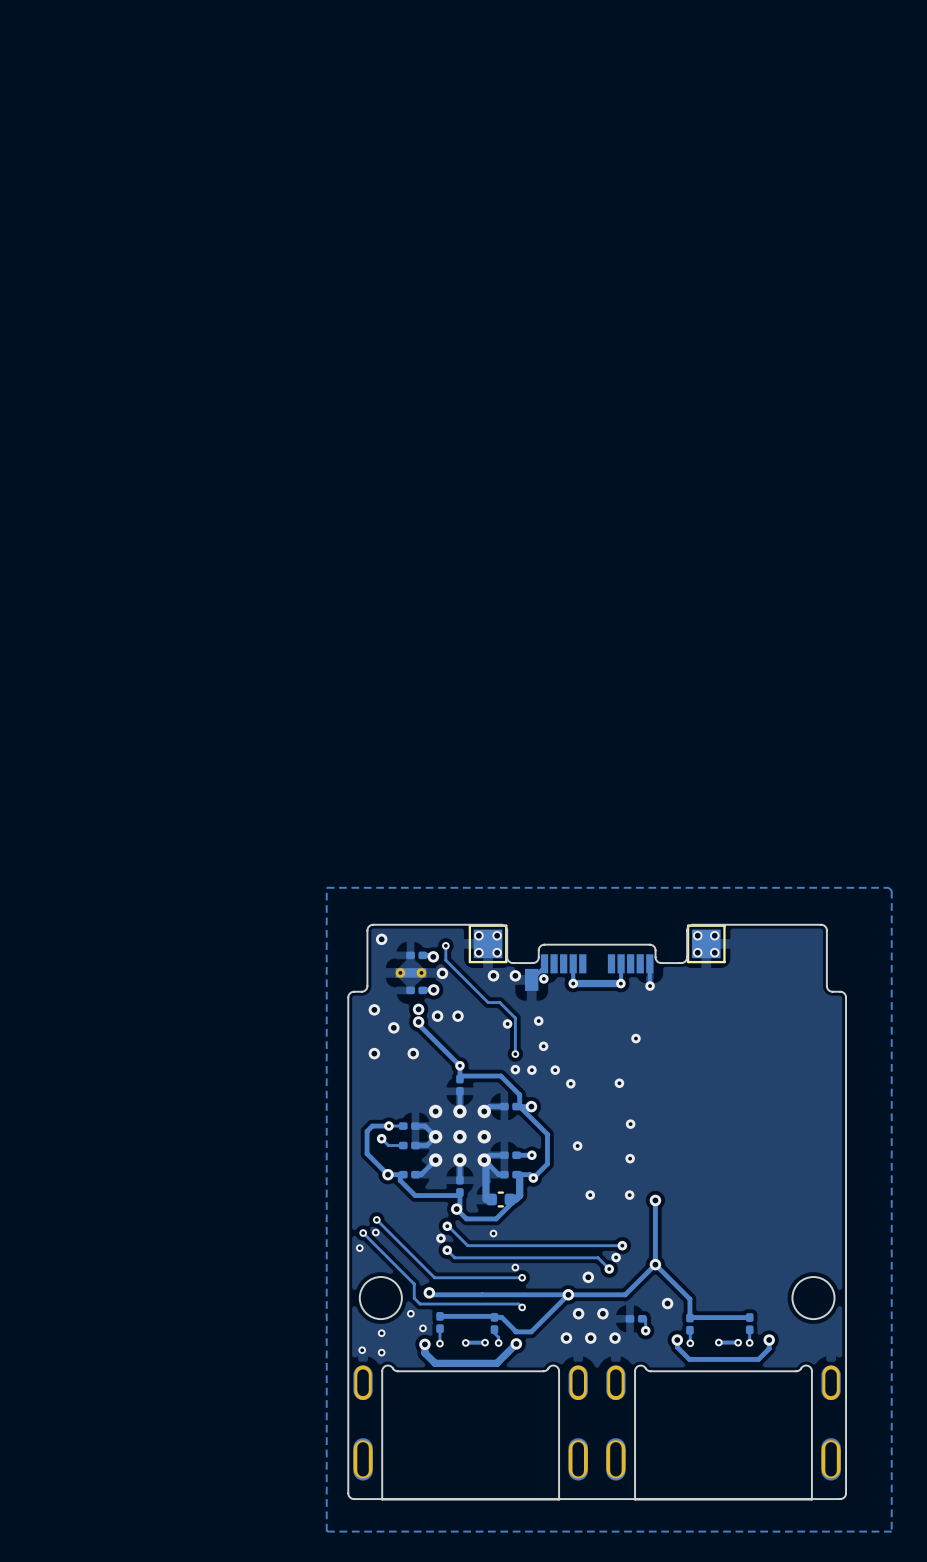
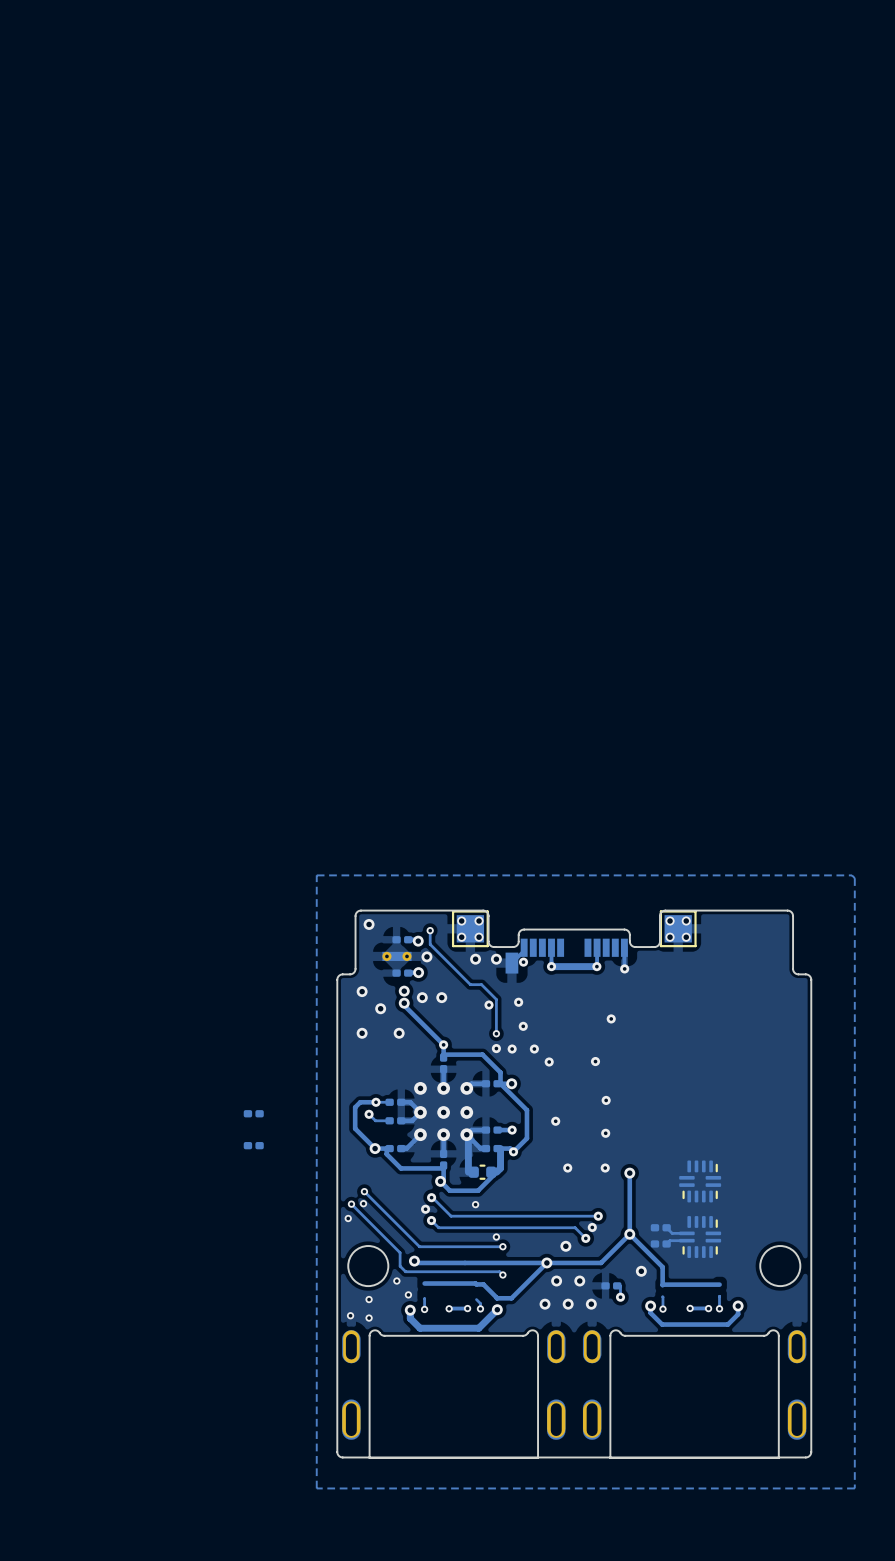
part: none -> (253, 1113)
part: none -> (253, 1145)
part: none -> (700, 1181)
part: none -> (660, 1227)
track: none -> (666, 1227) (672, 1233) (686, 1233)
part: none -> (700, 1237)
track: none -> (686, 1240) (669, 1240) (666, 1243)
part: none -> (660, 1243)
part: (440, 1322) -> none
part: (494, 1323) -> none
part: (749, 1323) -> none
part: (689, 1324) -> none

